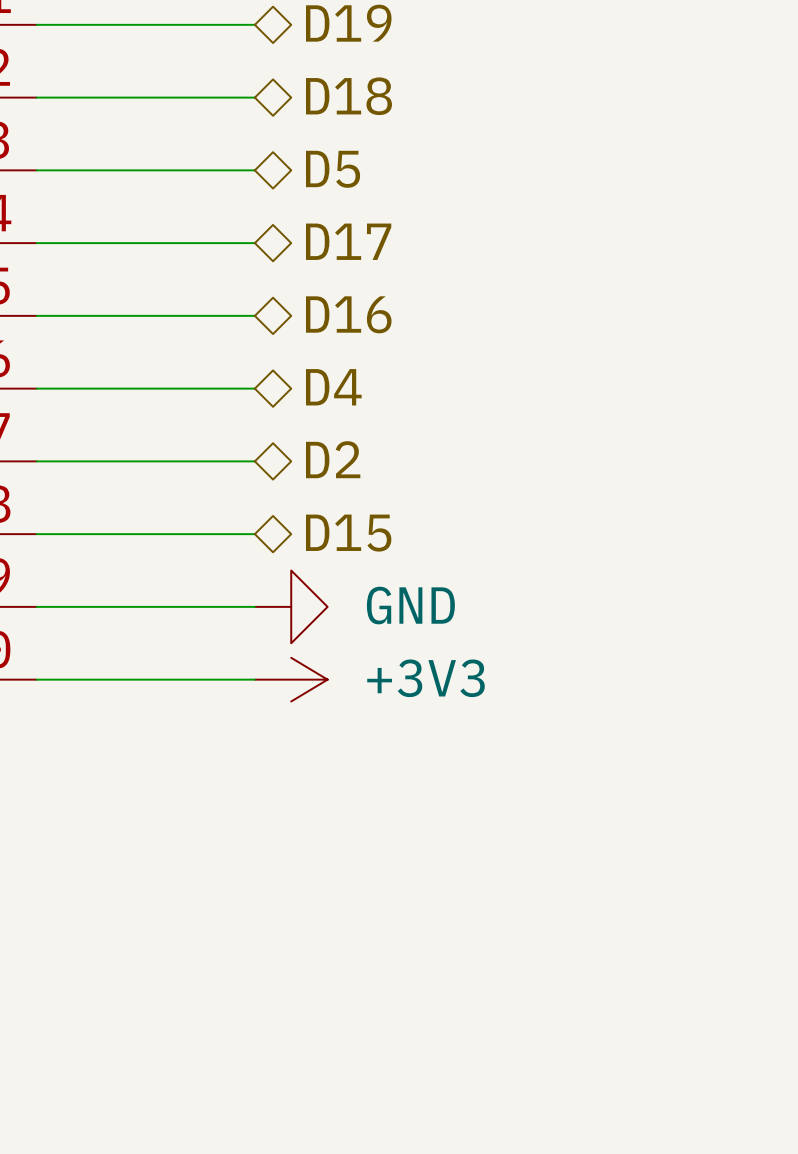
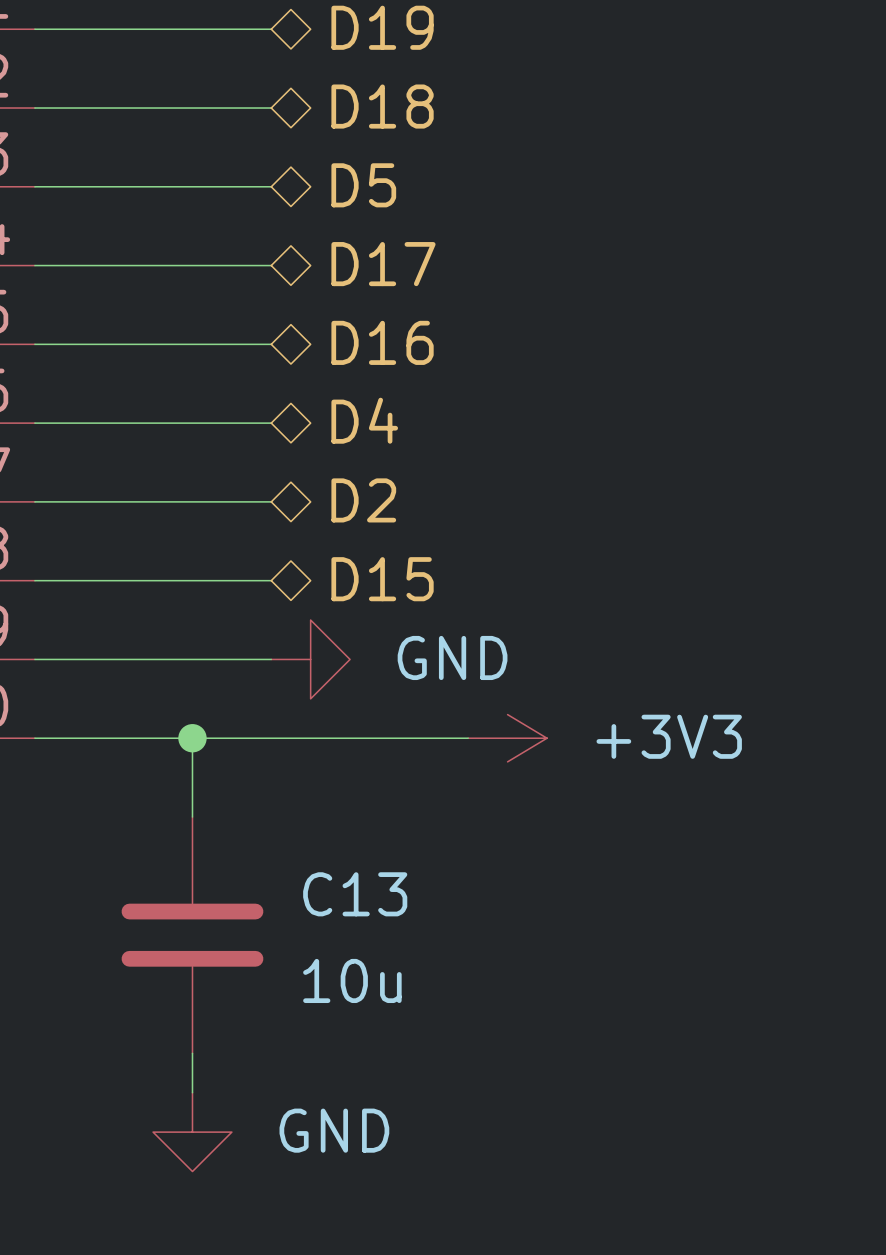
wire: none -> (192, 738) (192, 817)
junction: none -> (192, 738)
wire: none -> (271, 738) (468, 738)
power symbol position: +3V3 (291, 679) -> +3V3 (507, 738)
C13: none -> 10u (192, 935)
wire: none -> (192, 1053) (192, 1092)
power symbol: none -> GND (192, 1132)

